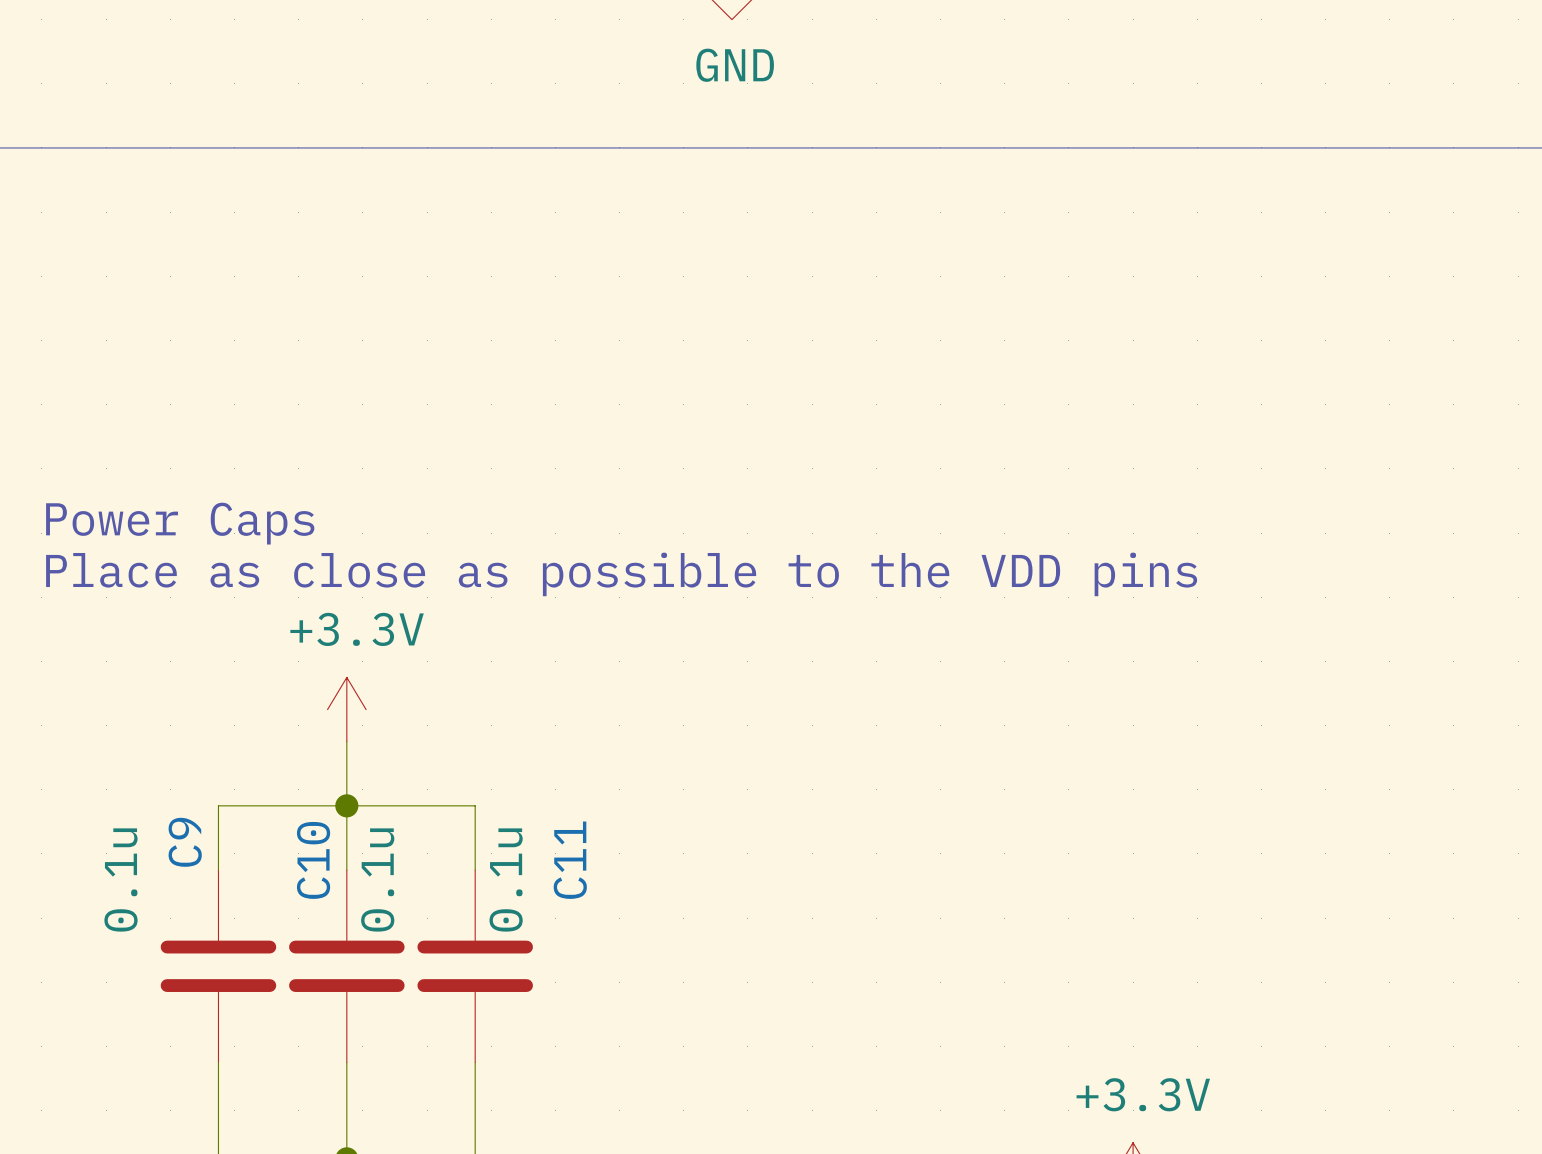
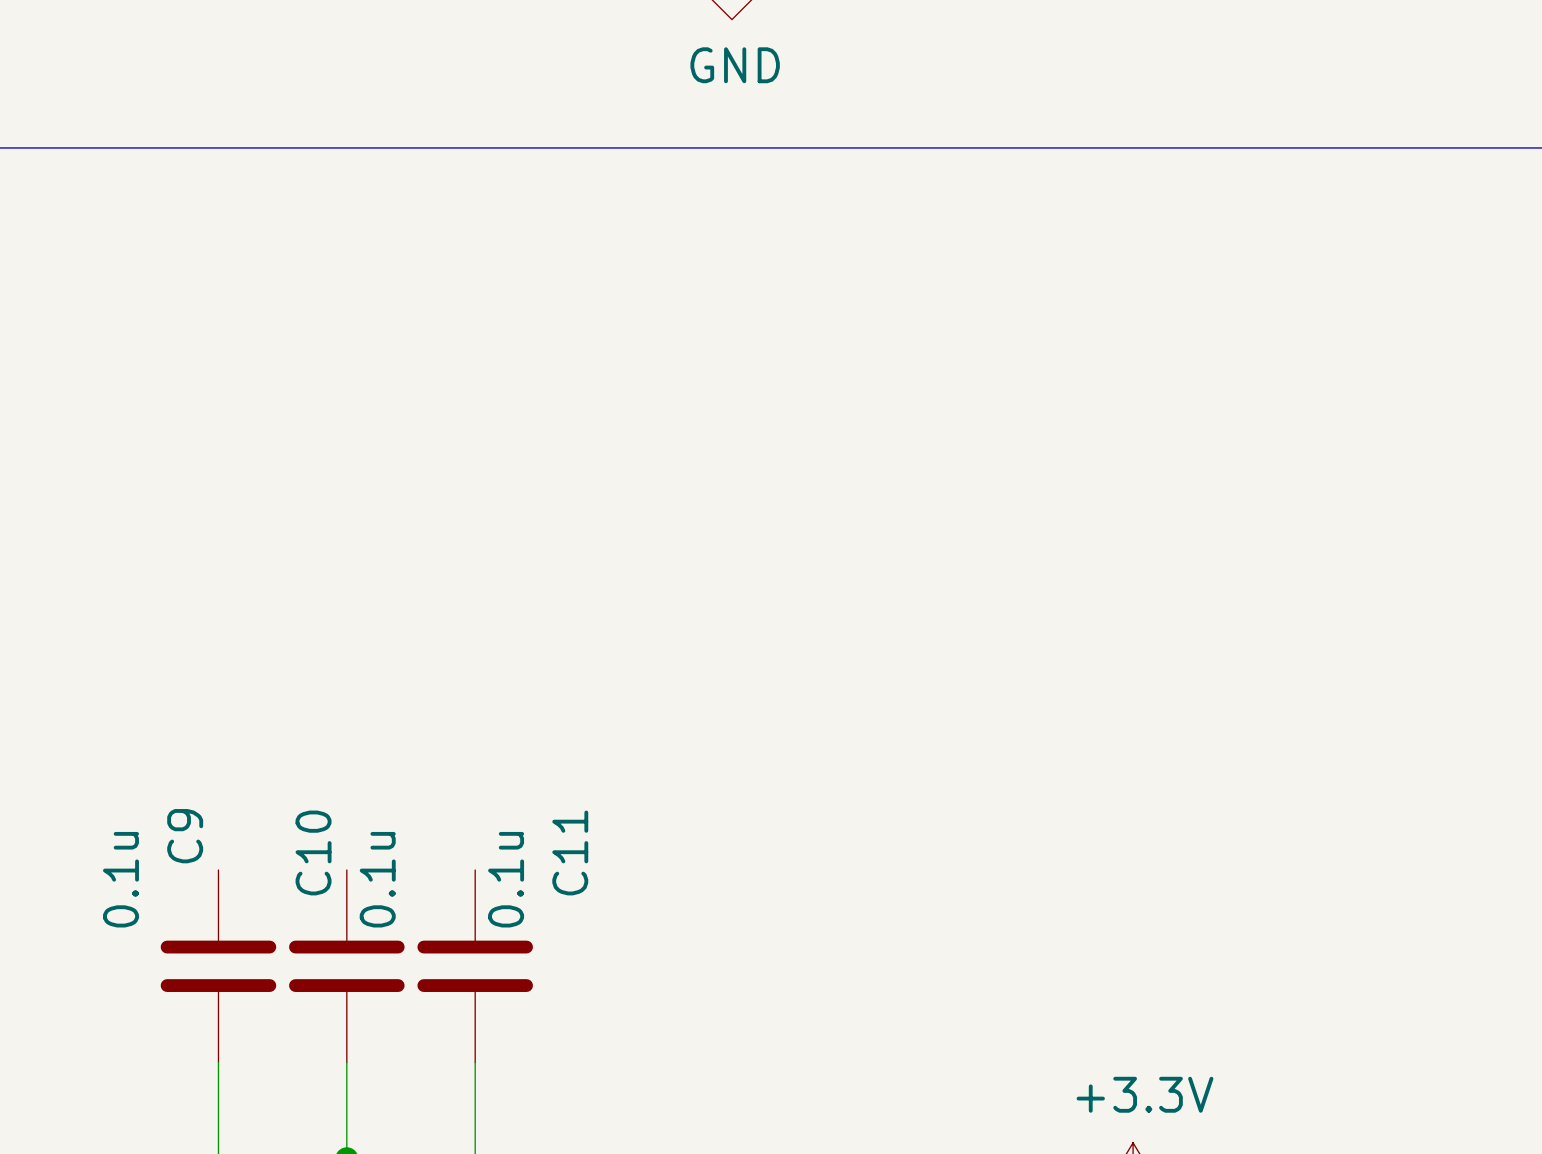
text: Power Caps (180, 523) -> none
text: Place as close as possible to the VDD pins (621, 574) -> none
power symbol: +3.3V (346, 709) -> none
wire: (346, 741) (346, 870) -> none
junction: (346, 805) -> none
wire: (218, 870) (218, 805) (475, 805) (475, 870) -> none

